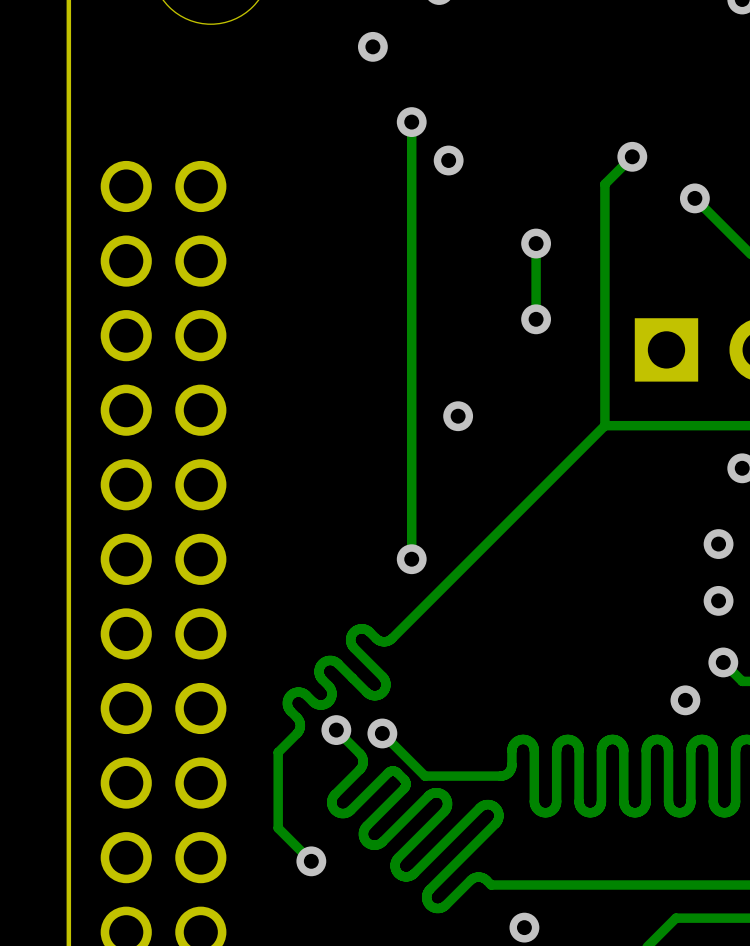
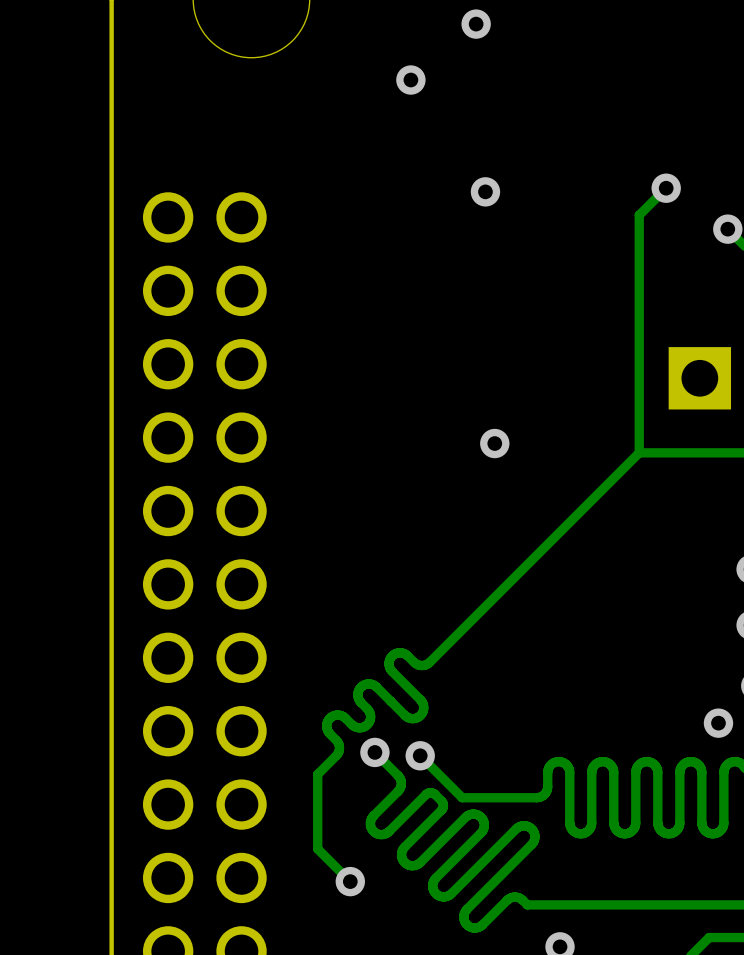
track: (411, 122) (411, 559) -> none
via: (411, 122) -> none
track: (536, 243) (536, 319) -> none
via: (536, 243) -> none
via: (536, 319) -> none
via: (411, 559) -> none

